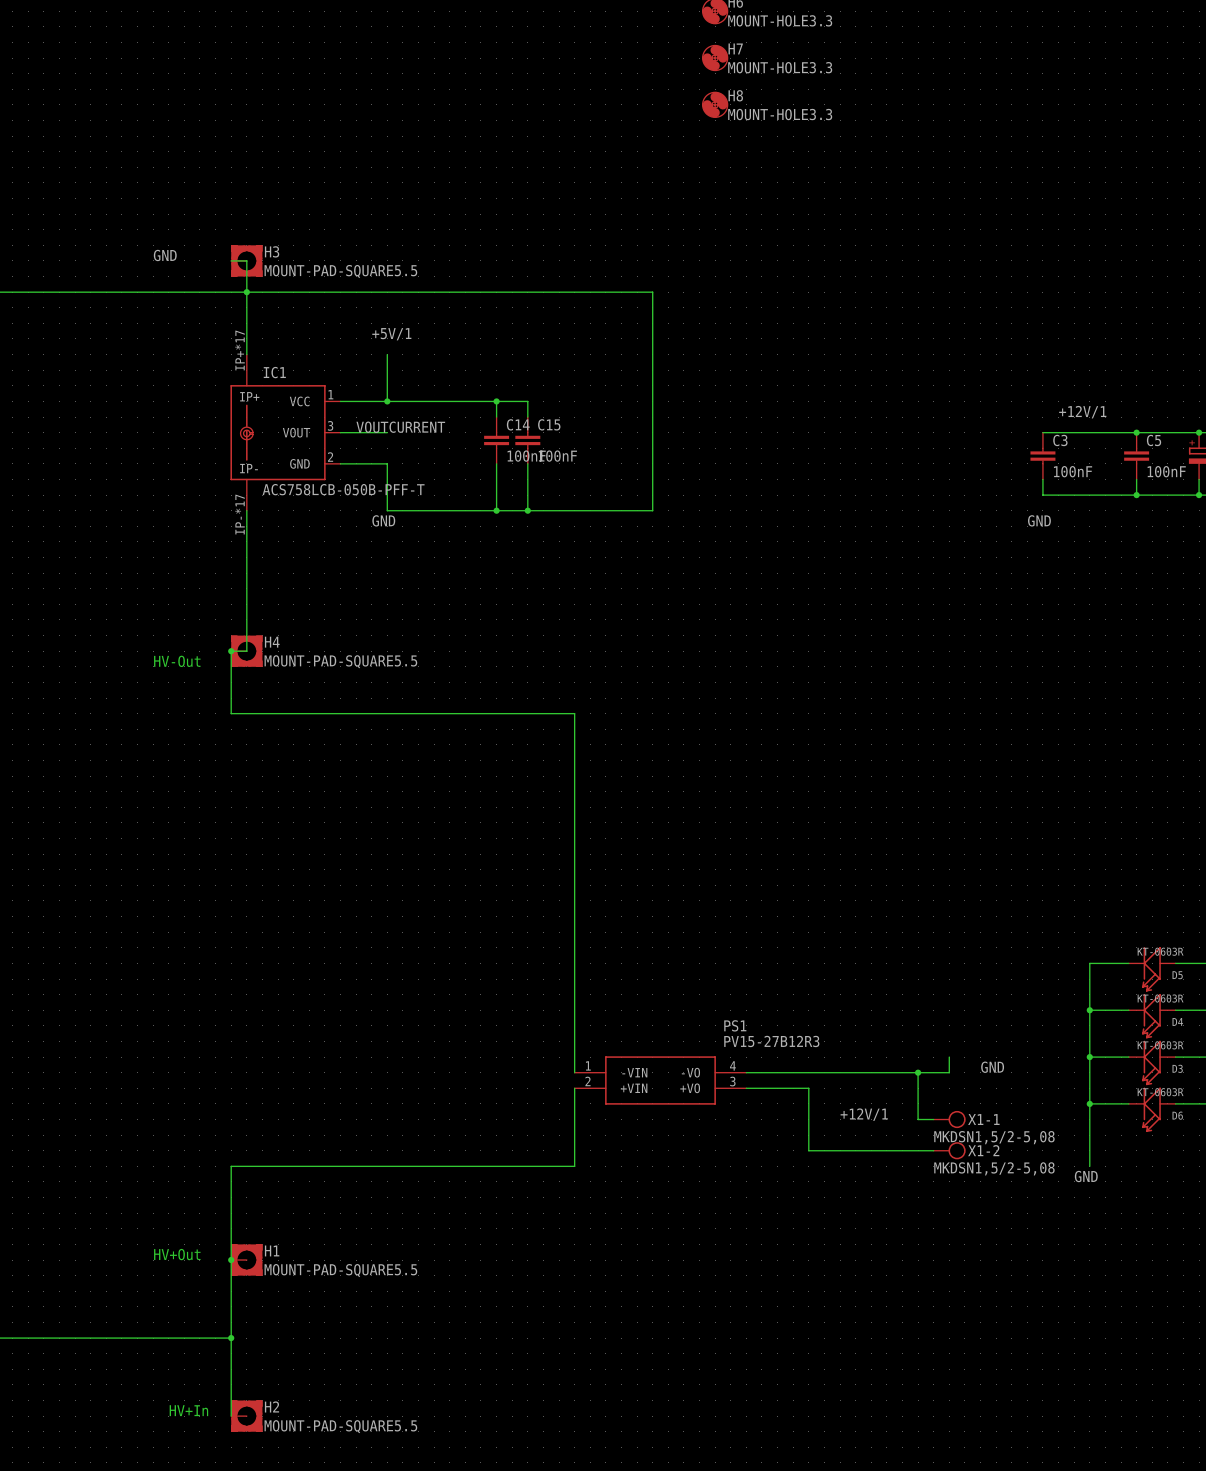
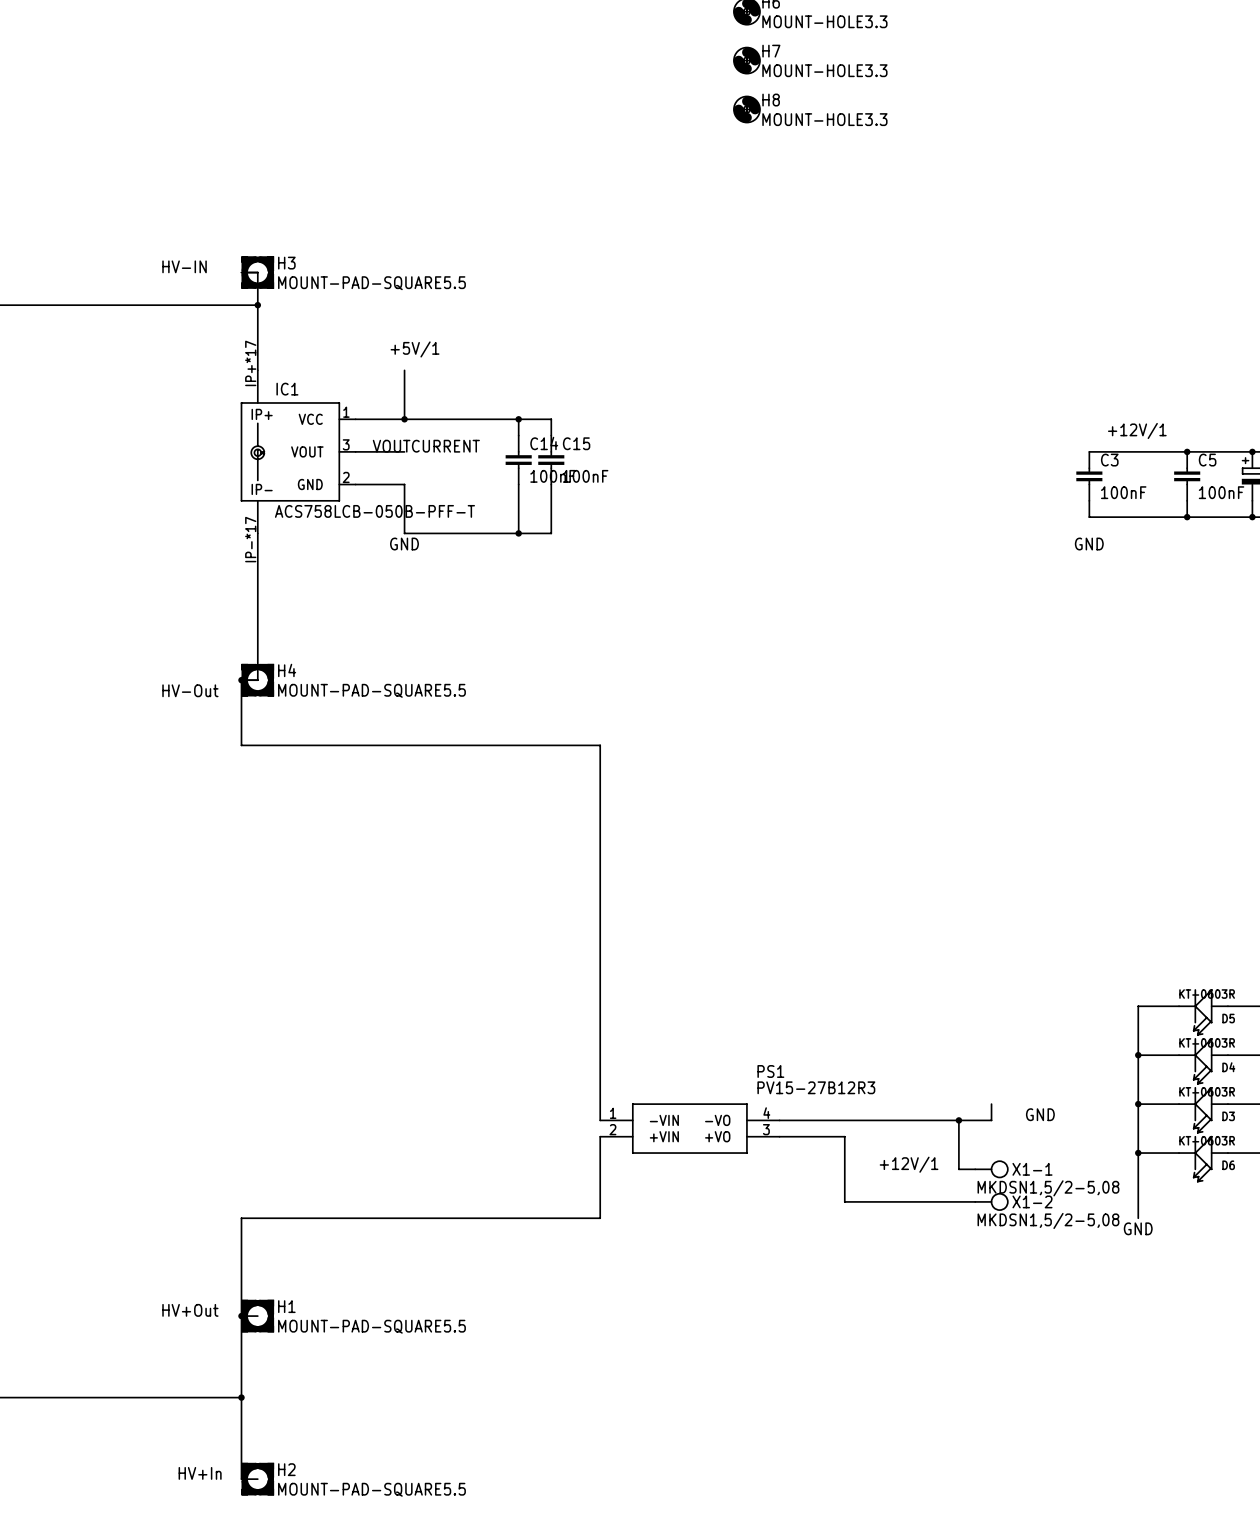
label: GND (165, 255) -> HV-IN (184, 266)
wire: (246, 292) (652, 292) (652, 510) (527, 510) -> none
junction: (527, 510) -> none

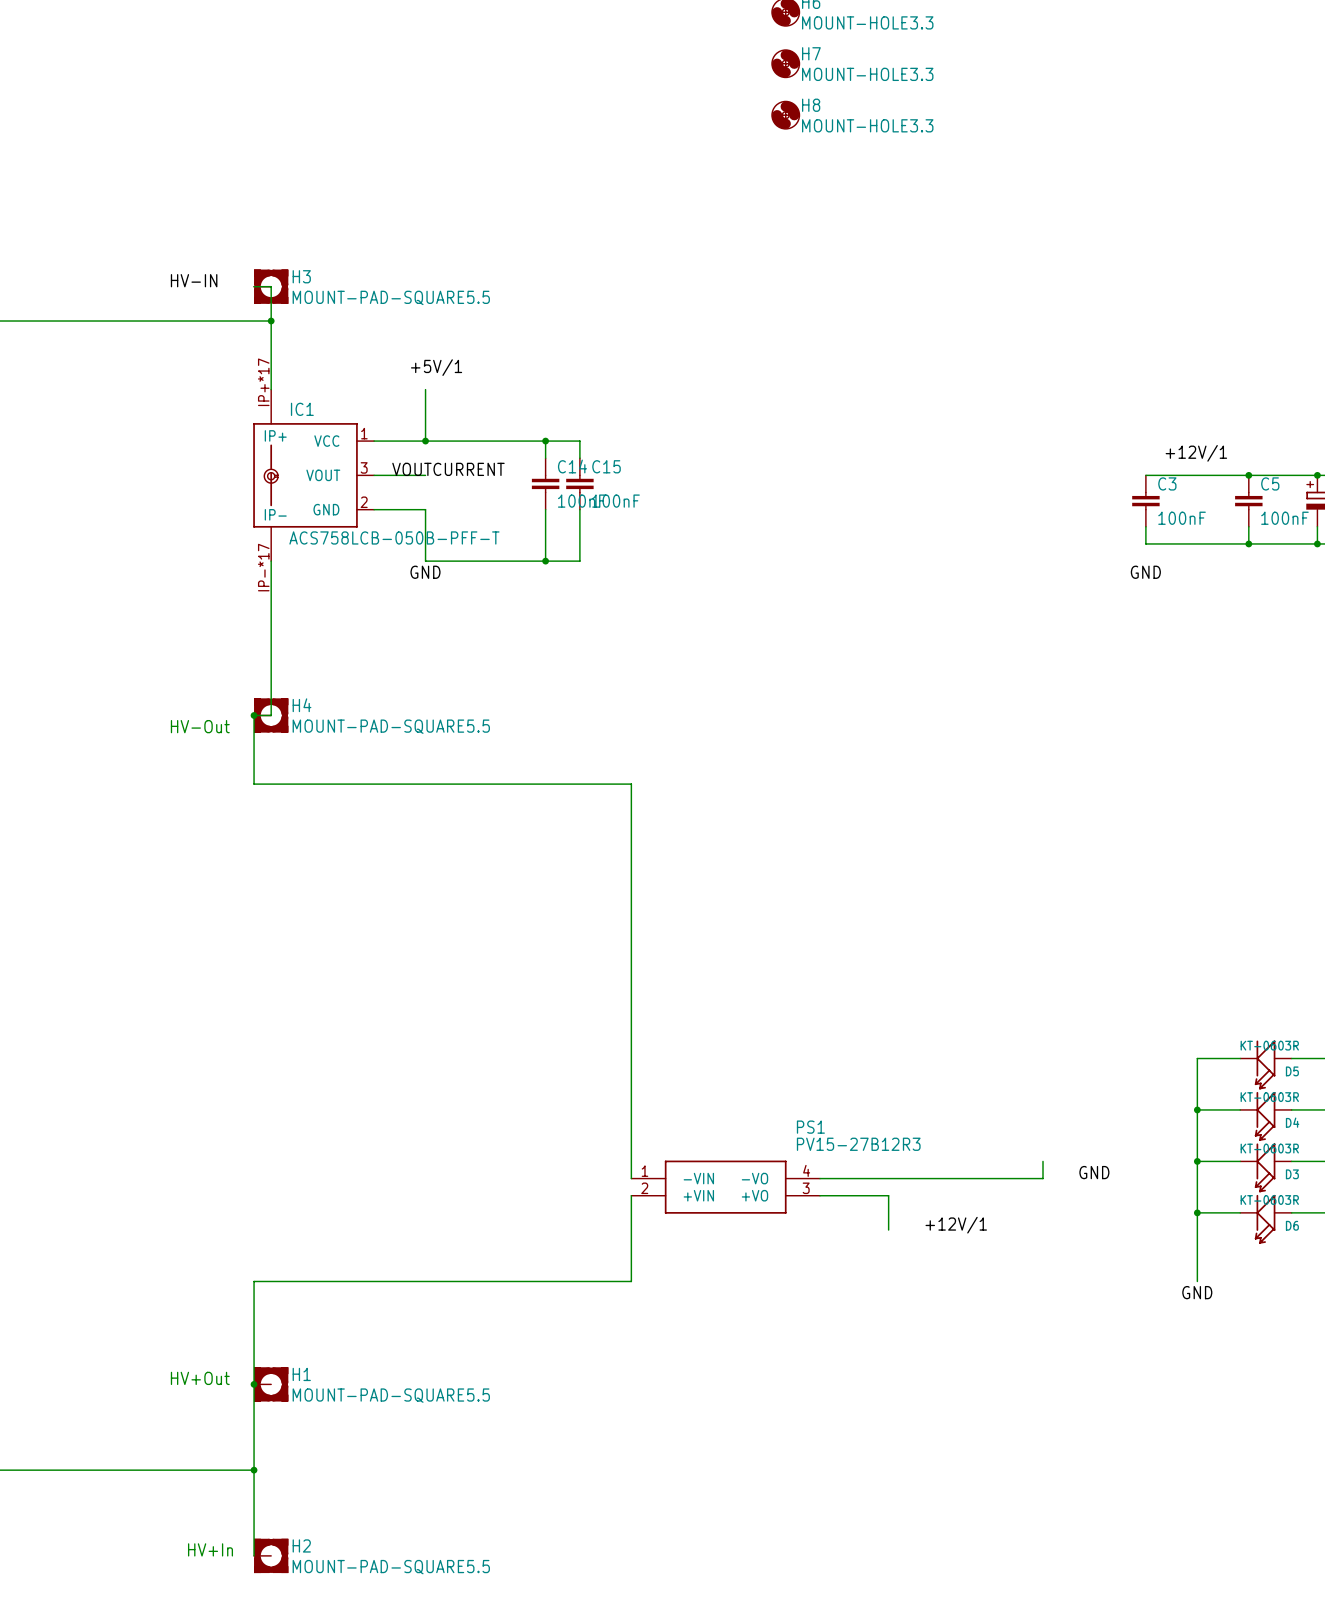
wire: (958, 1120) (958, 1169) (975, 1169) -> none
junction: (958, 1120) -> none
wire: (844, 1169) (844, 1201) (975, 1201) -> none
X1-1: MKDSN1,5/2-5,08 (991, 1169) -> none
X1-2: MKDSN1,5/2-5,08 (991, 1201) -> none

